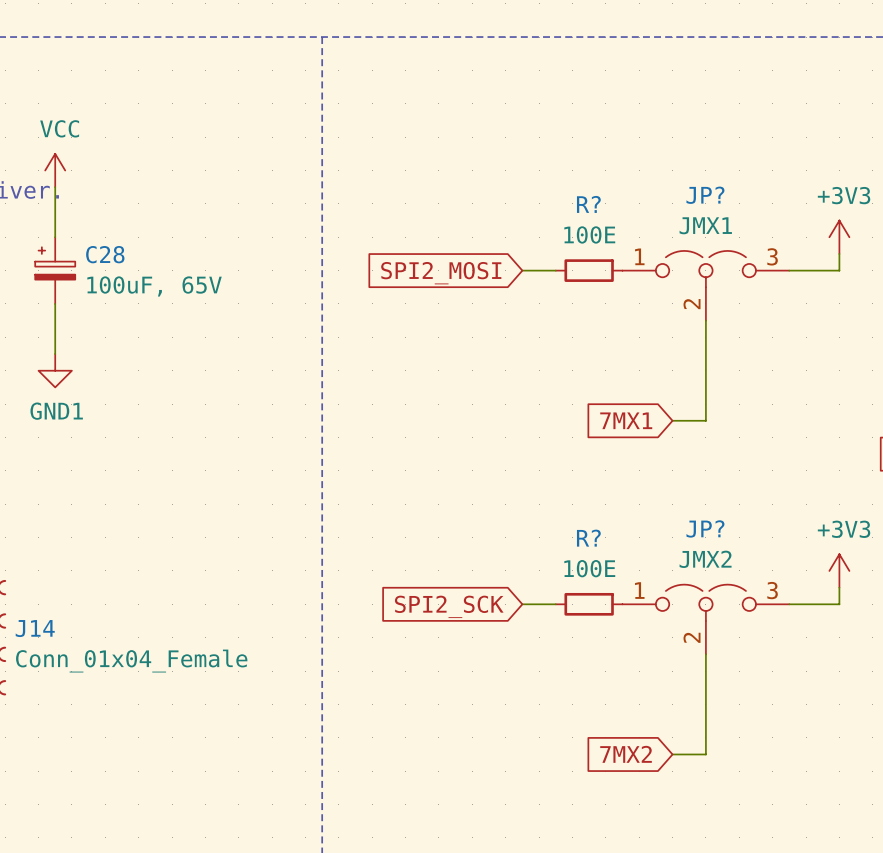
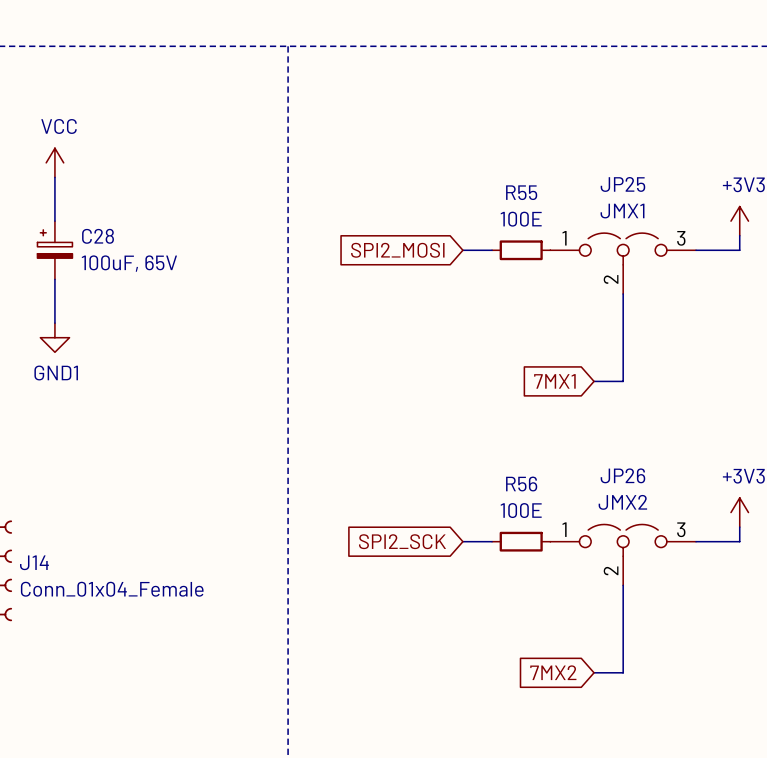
JP? name: JP? (705, 195) -> JP25 (622, 184)
R? name: R? (588, 204) -> R55 (521, 192)
JP? name: JP? (705, 528) -> JP26 (622, 475)
R? name: R? (588, 538) -> R56 (521, 484)

